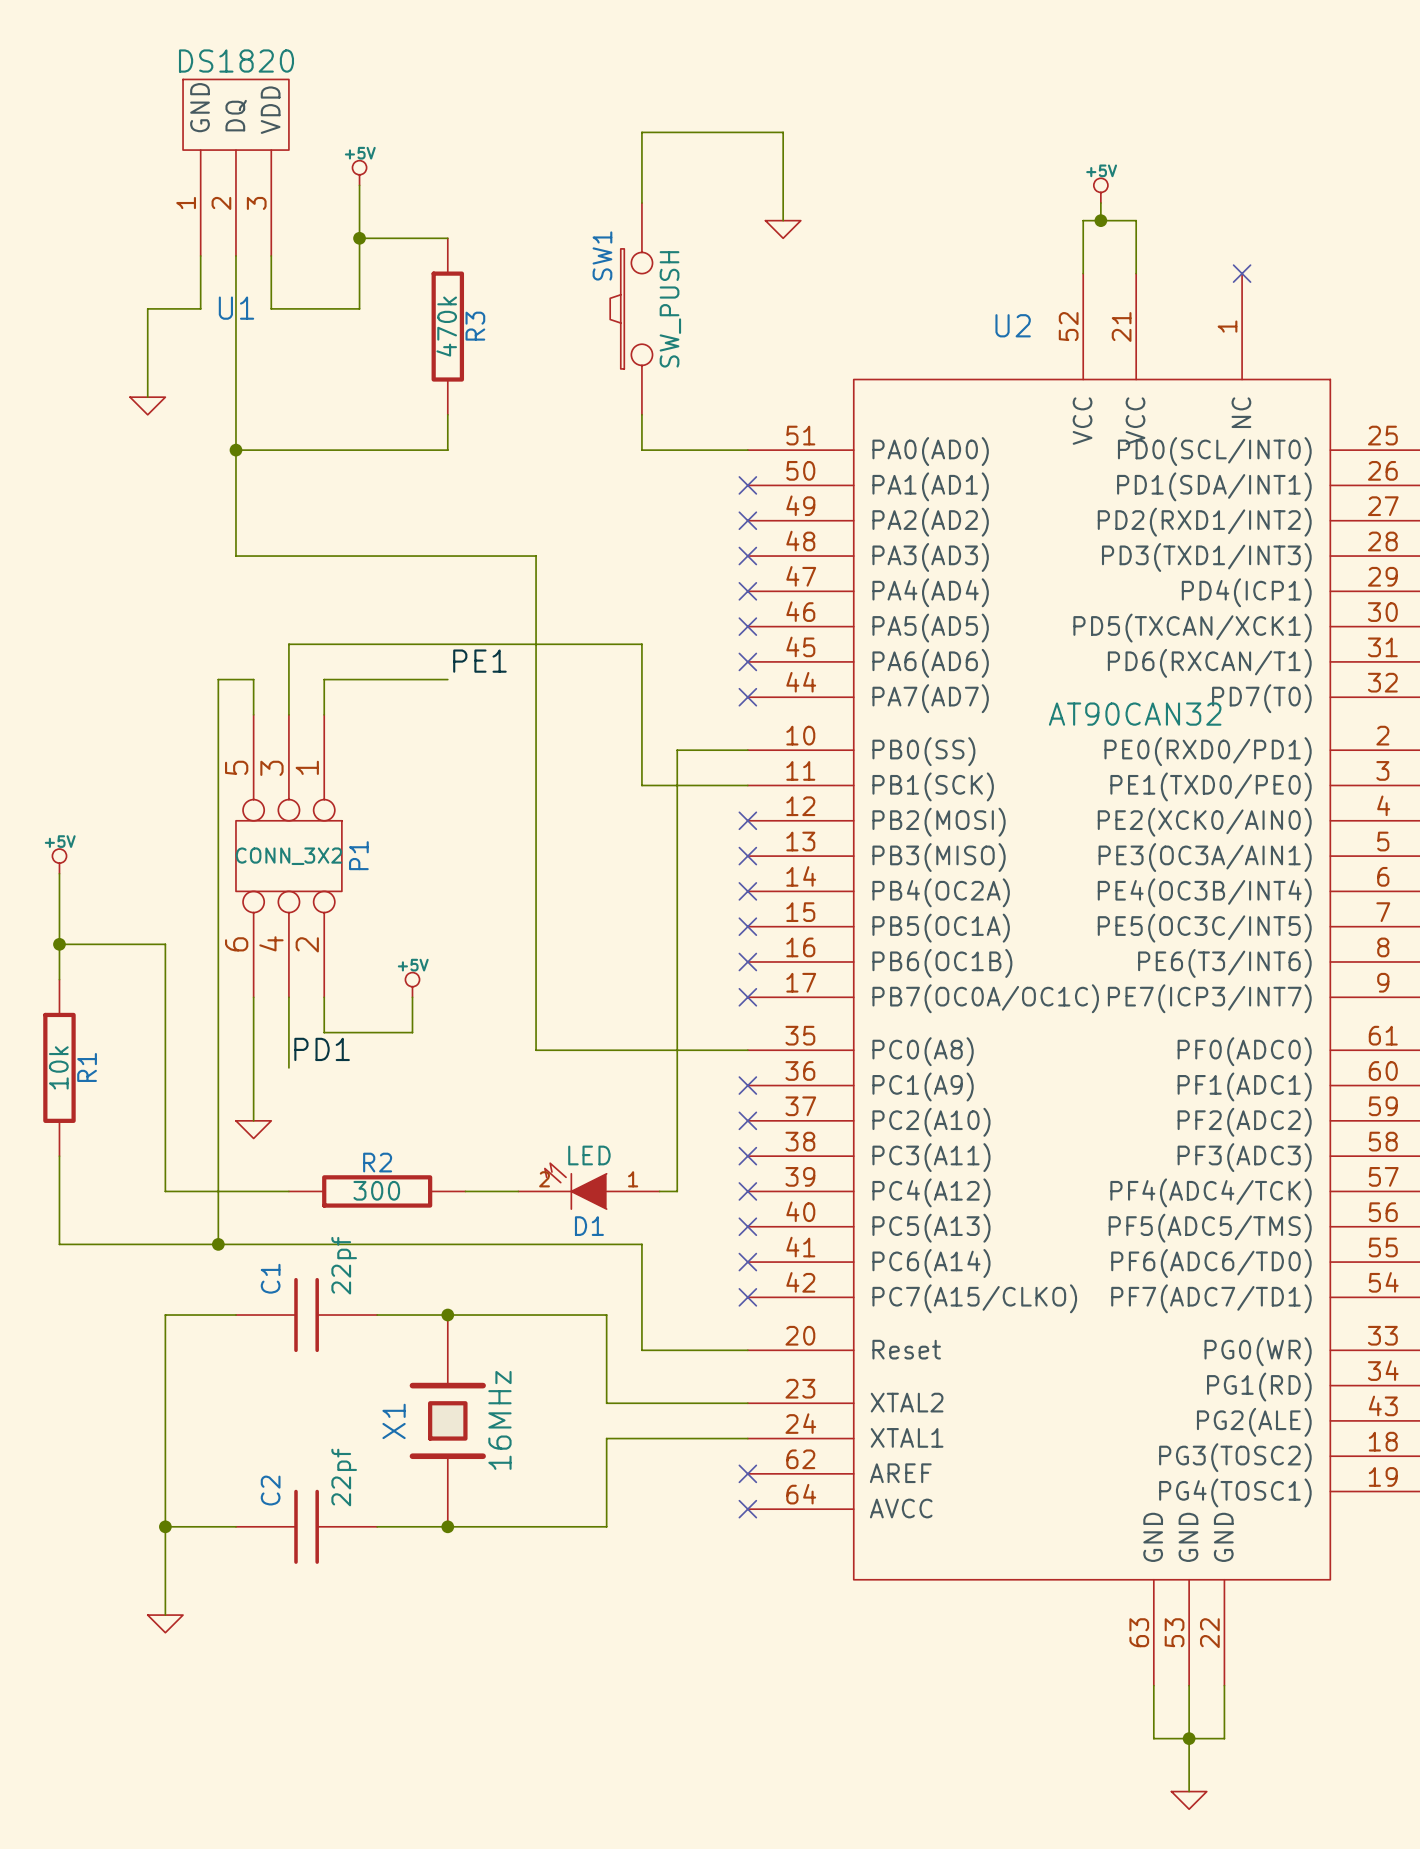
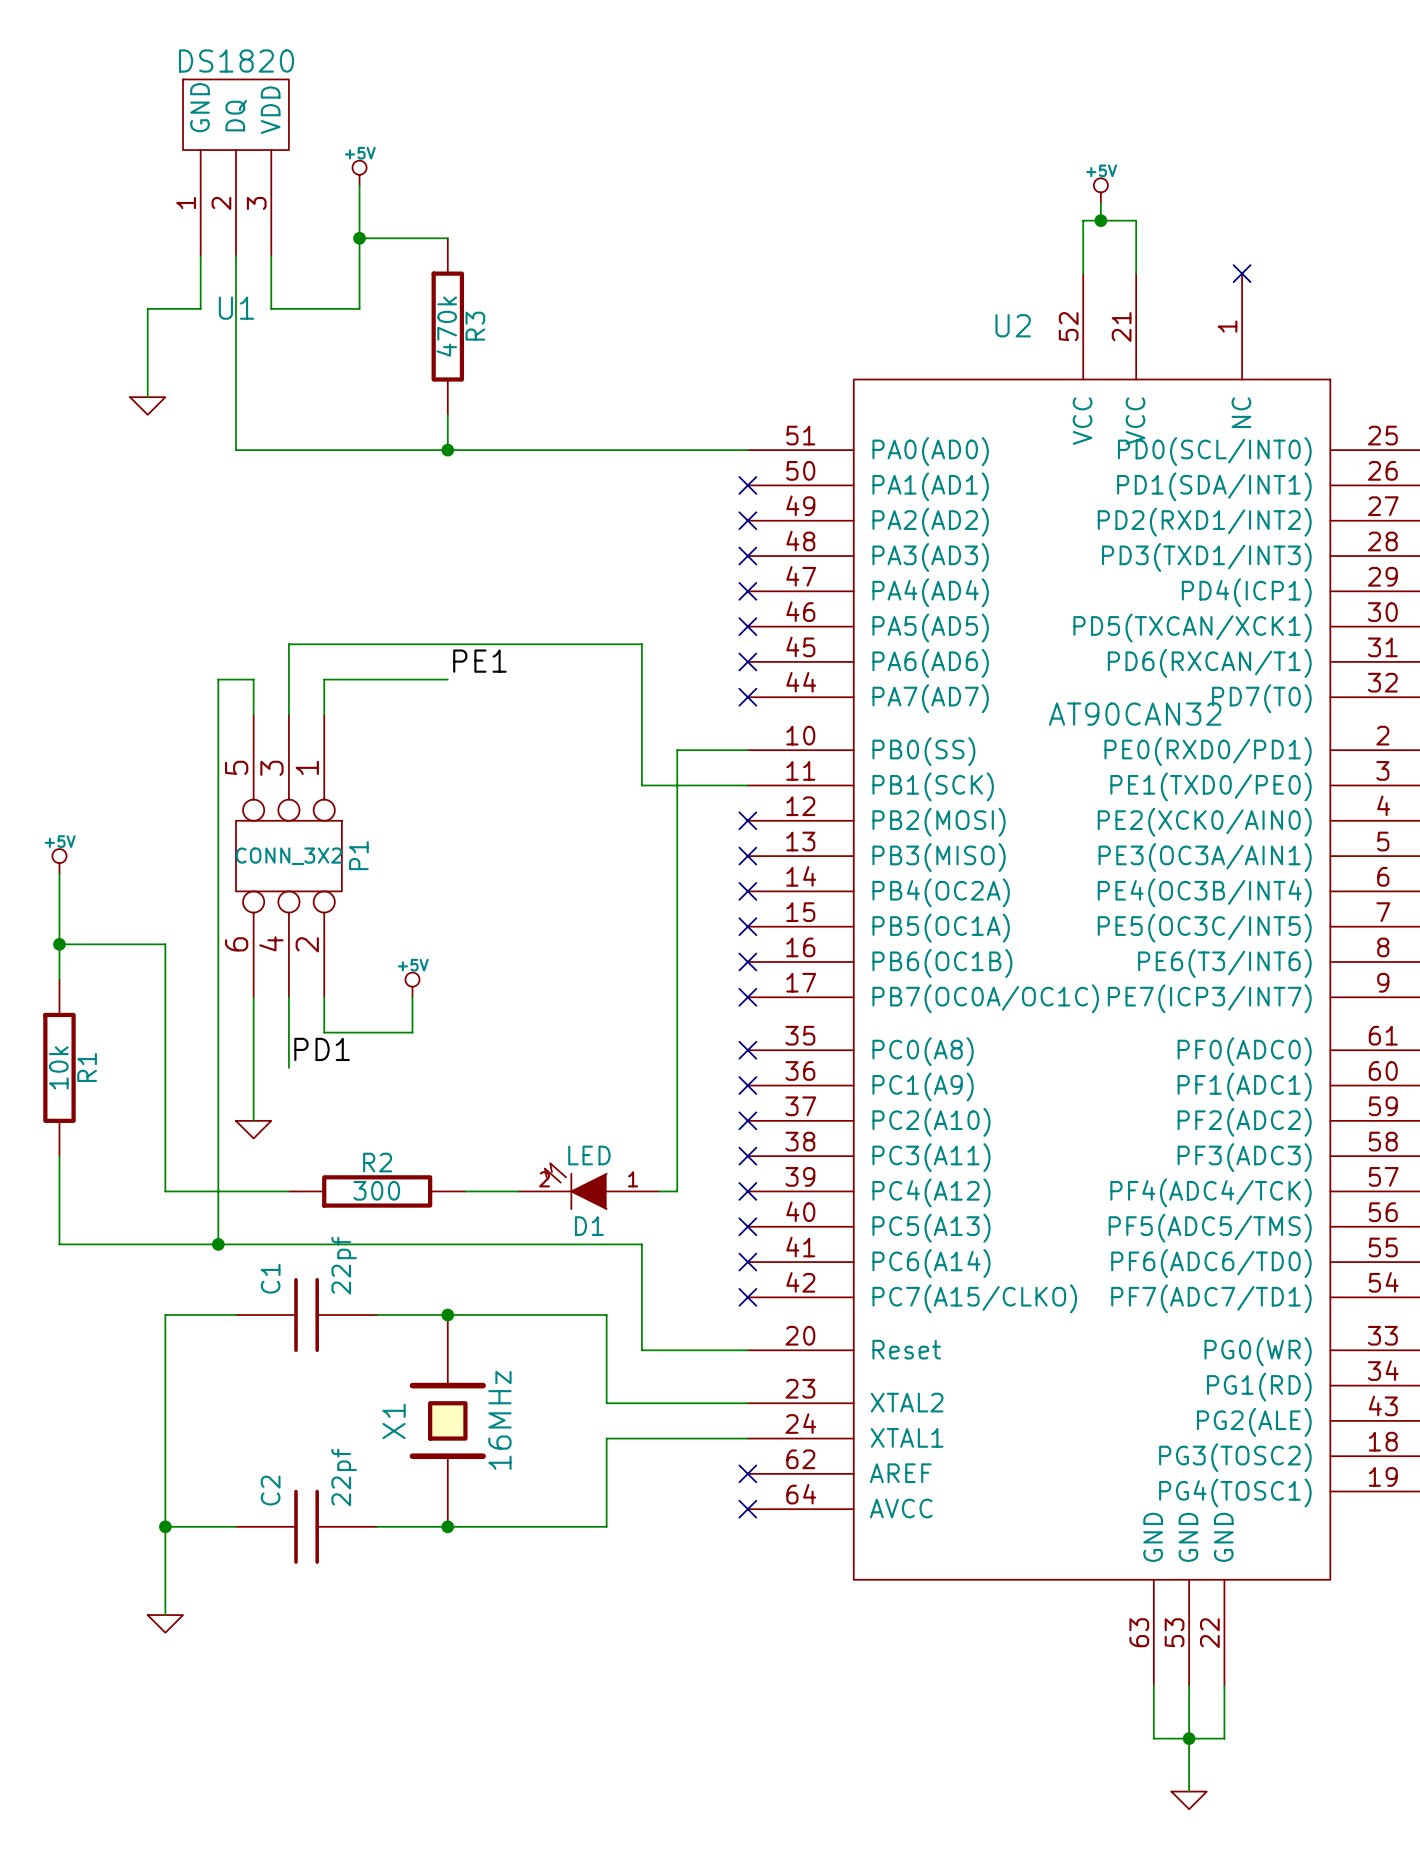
wire: (641, 203) (641, 132) (783, 132) (783, 220) -> none
power symbol: (783, 229) -> none
SW1: SW_PUSH (631, 308) -> none
wire: (641, 414) (641, 450) -> (447, 450) (641, 450)
wire: (235, 450) (235, 556) (536, 556) (536, 1050) (747, 1050) -> none
junction: (235, 450) -> none
junction: none -> (447, 450)
no-connect mark: none -> (747, 1050)

